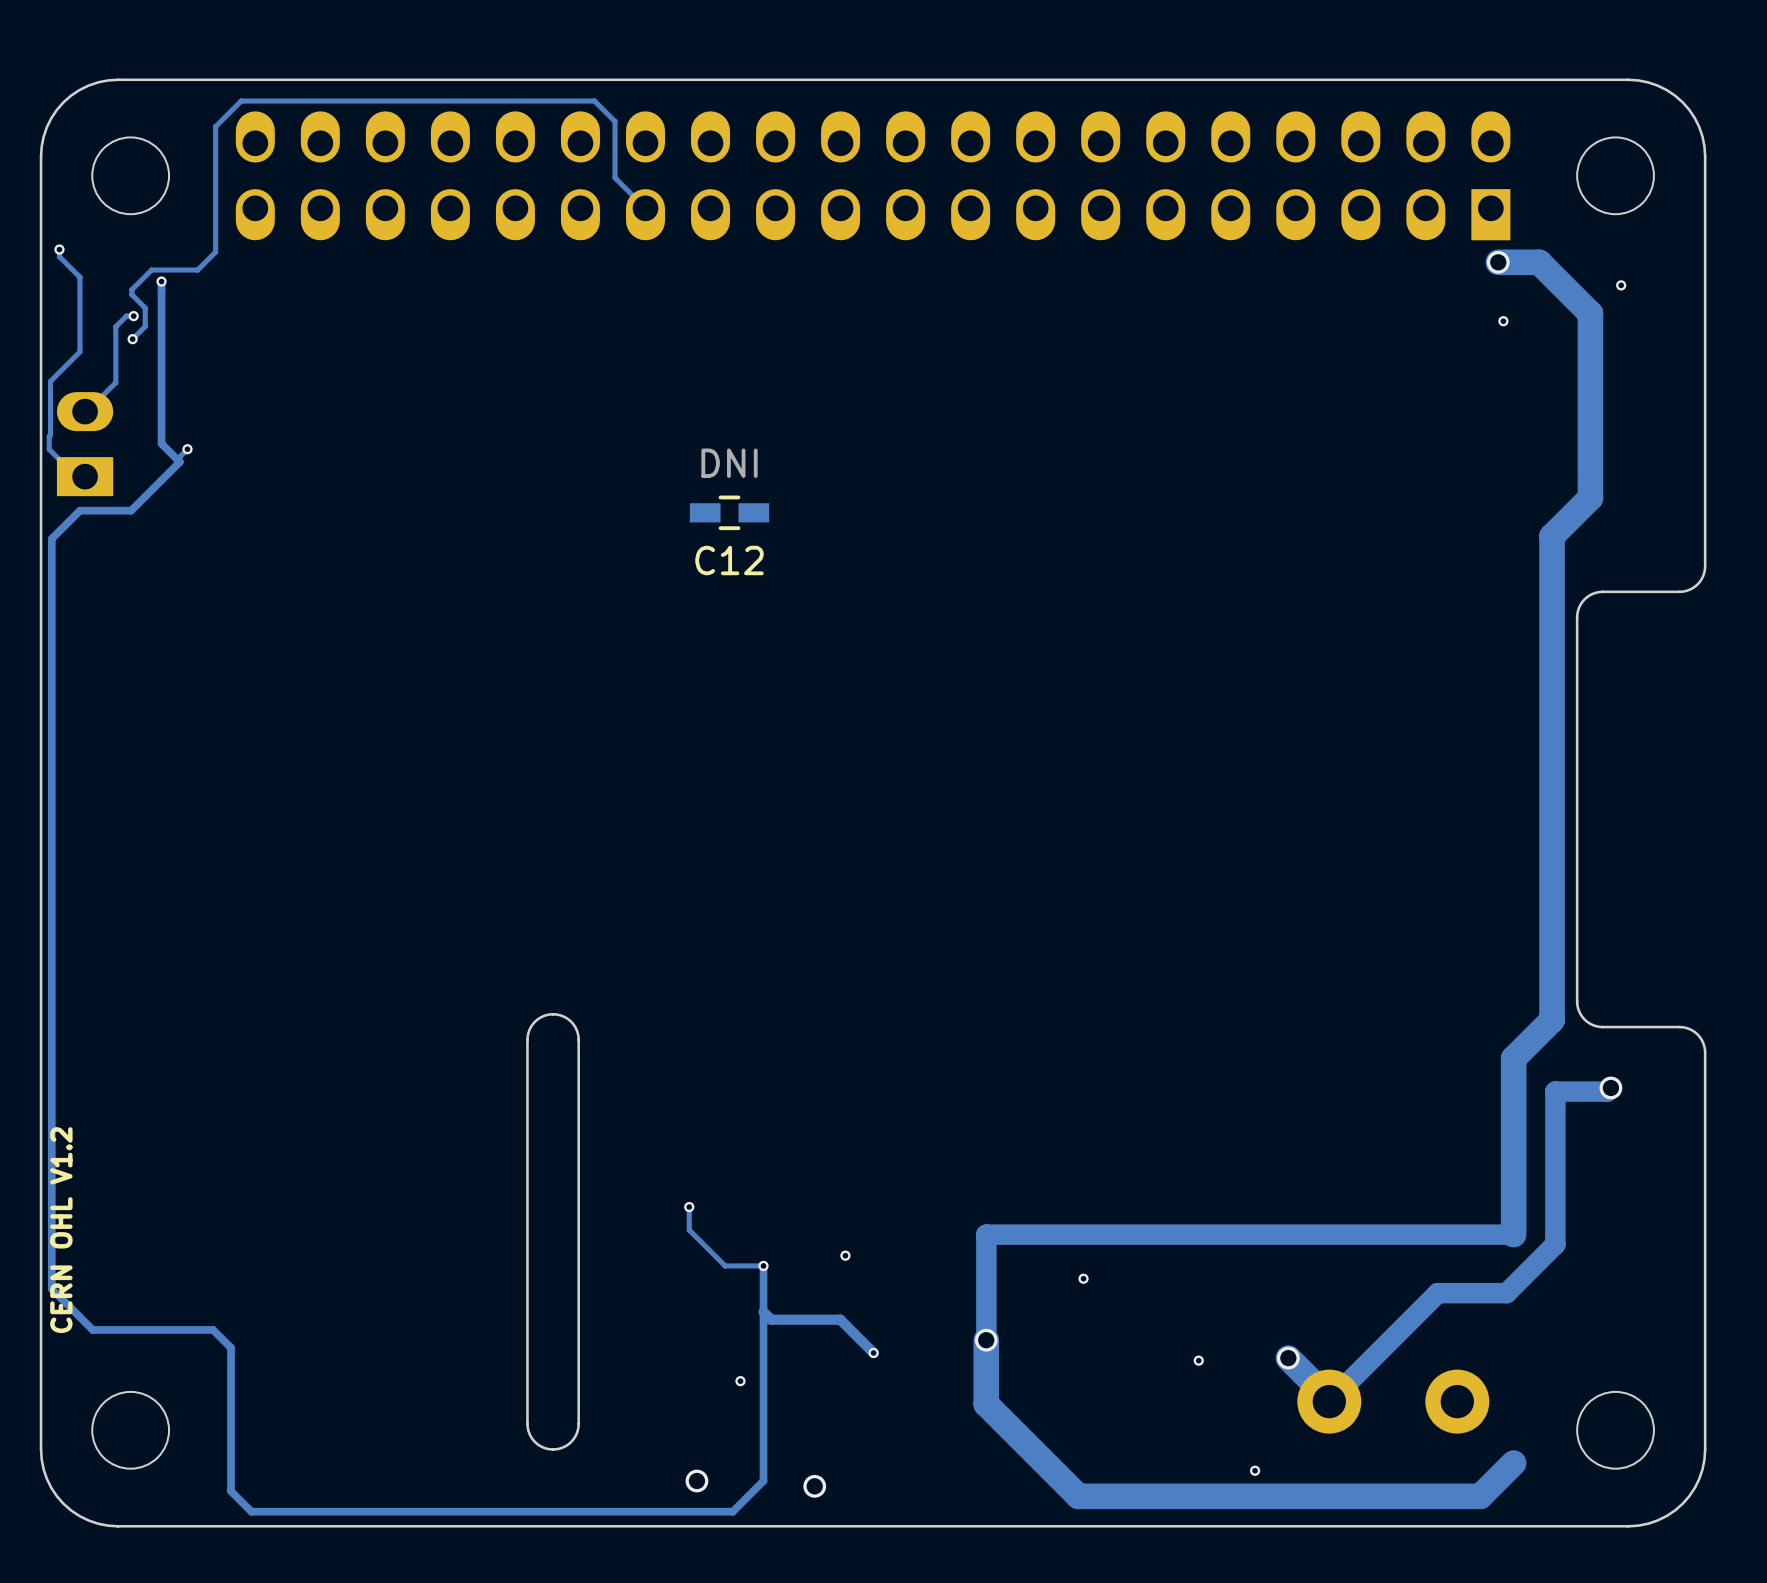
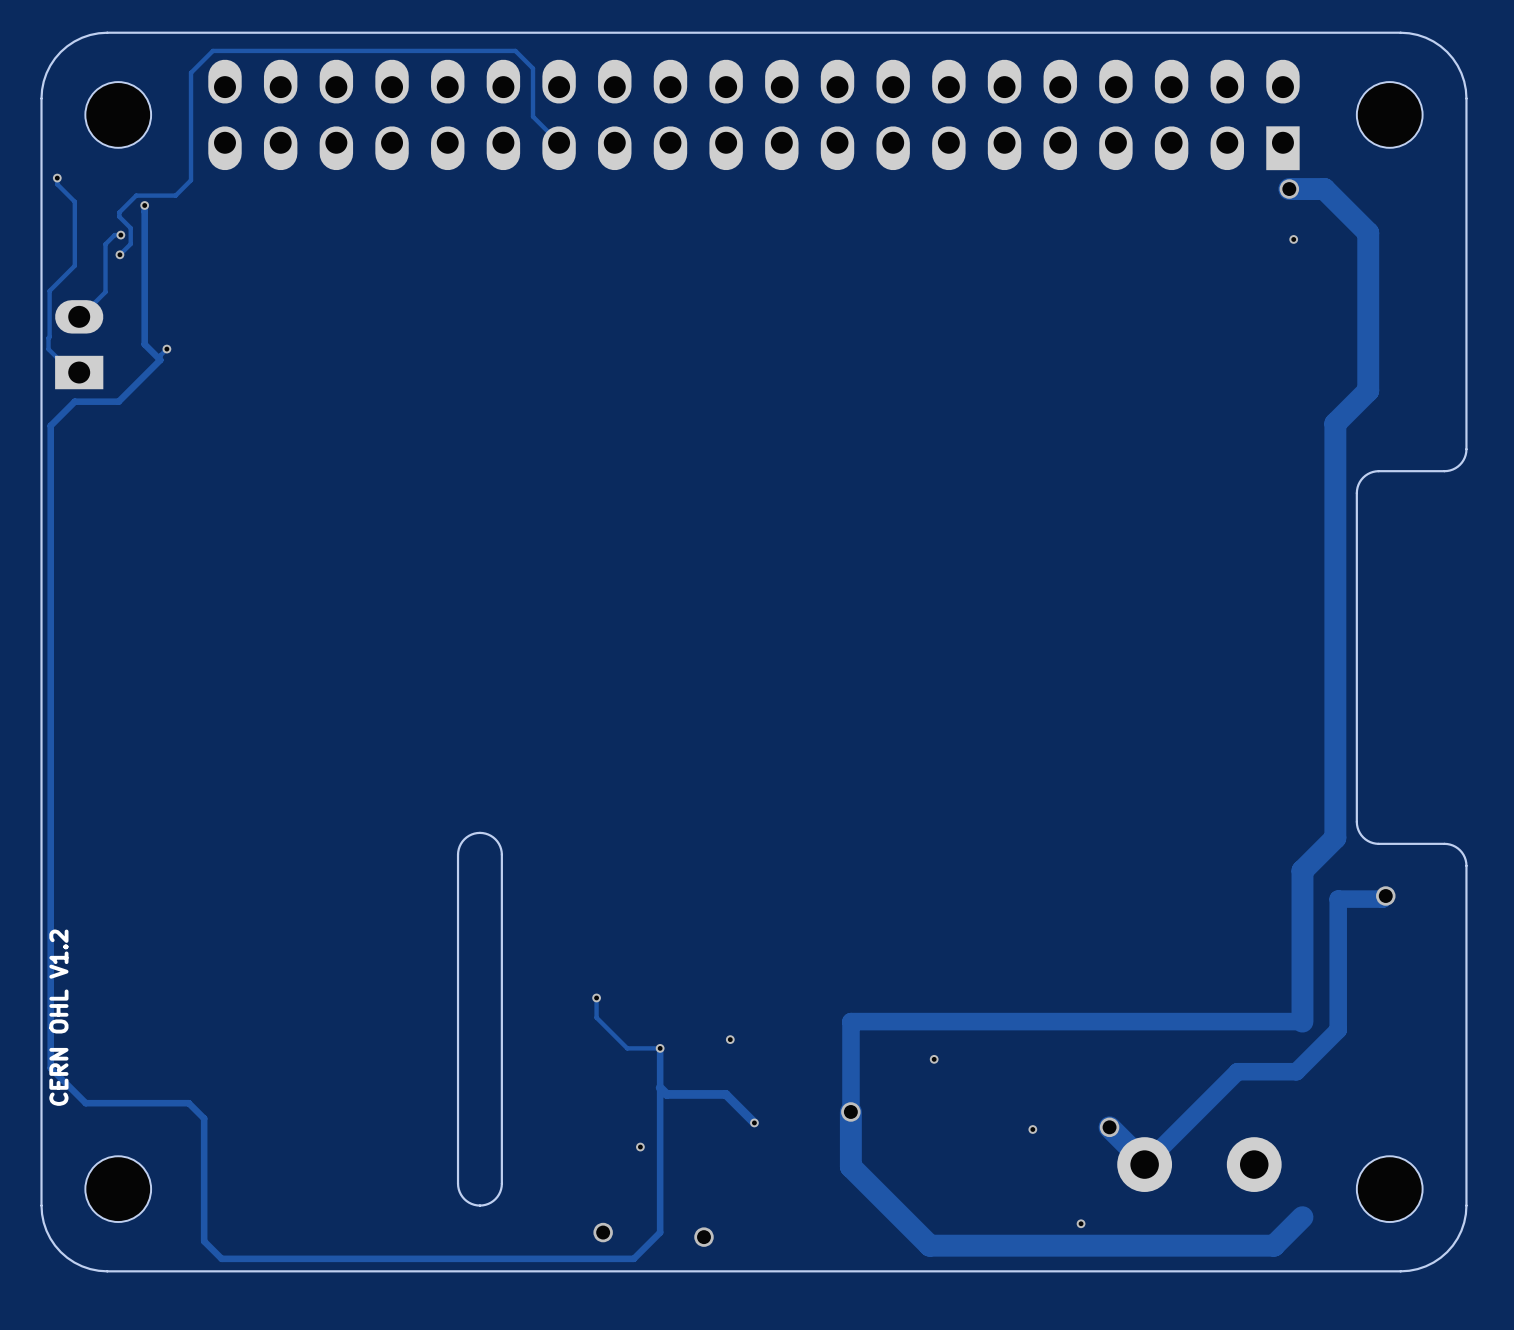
via: (1621, 285) -> none
C12: DNI (729, 512) -> none

